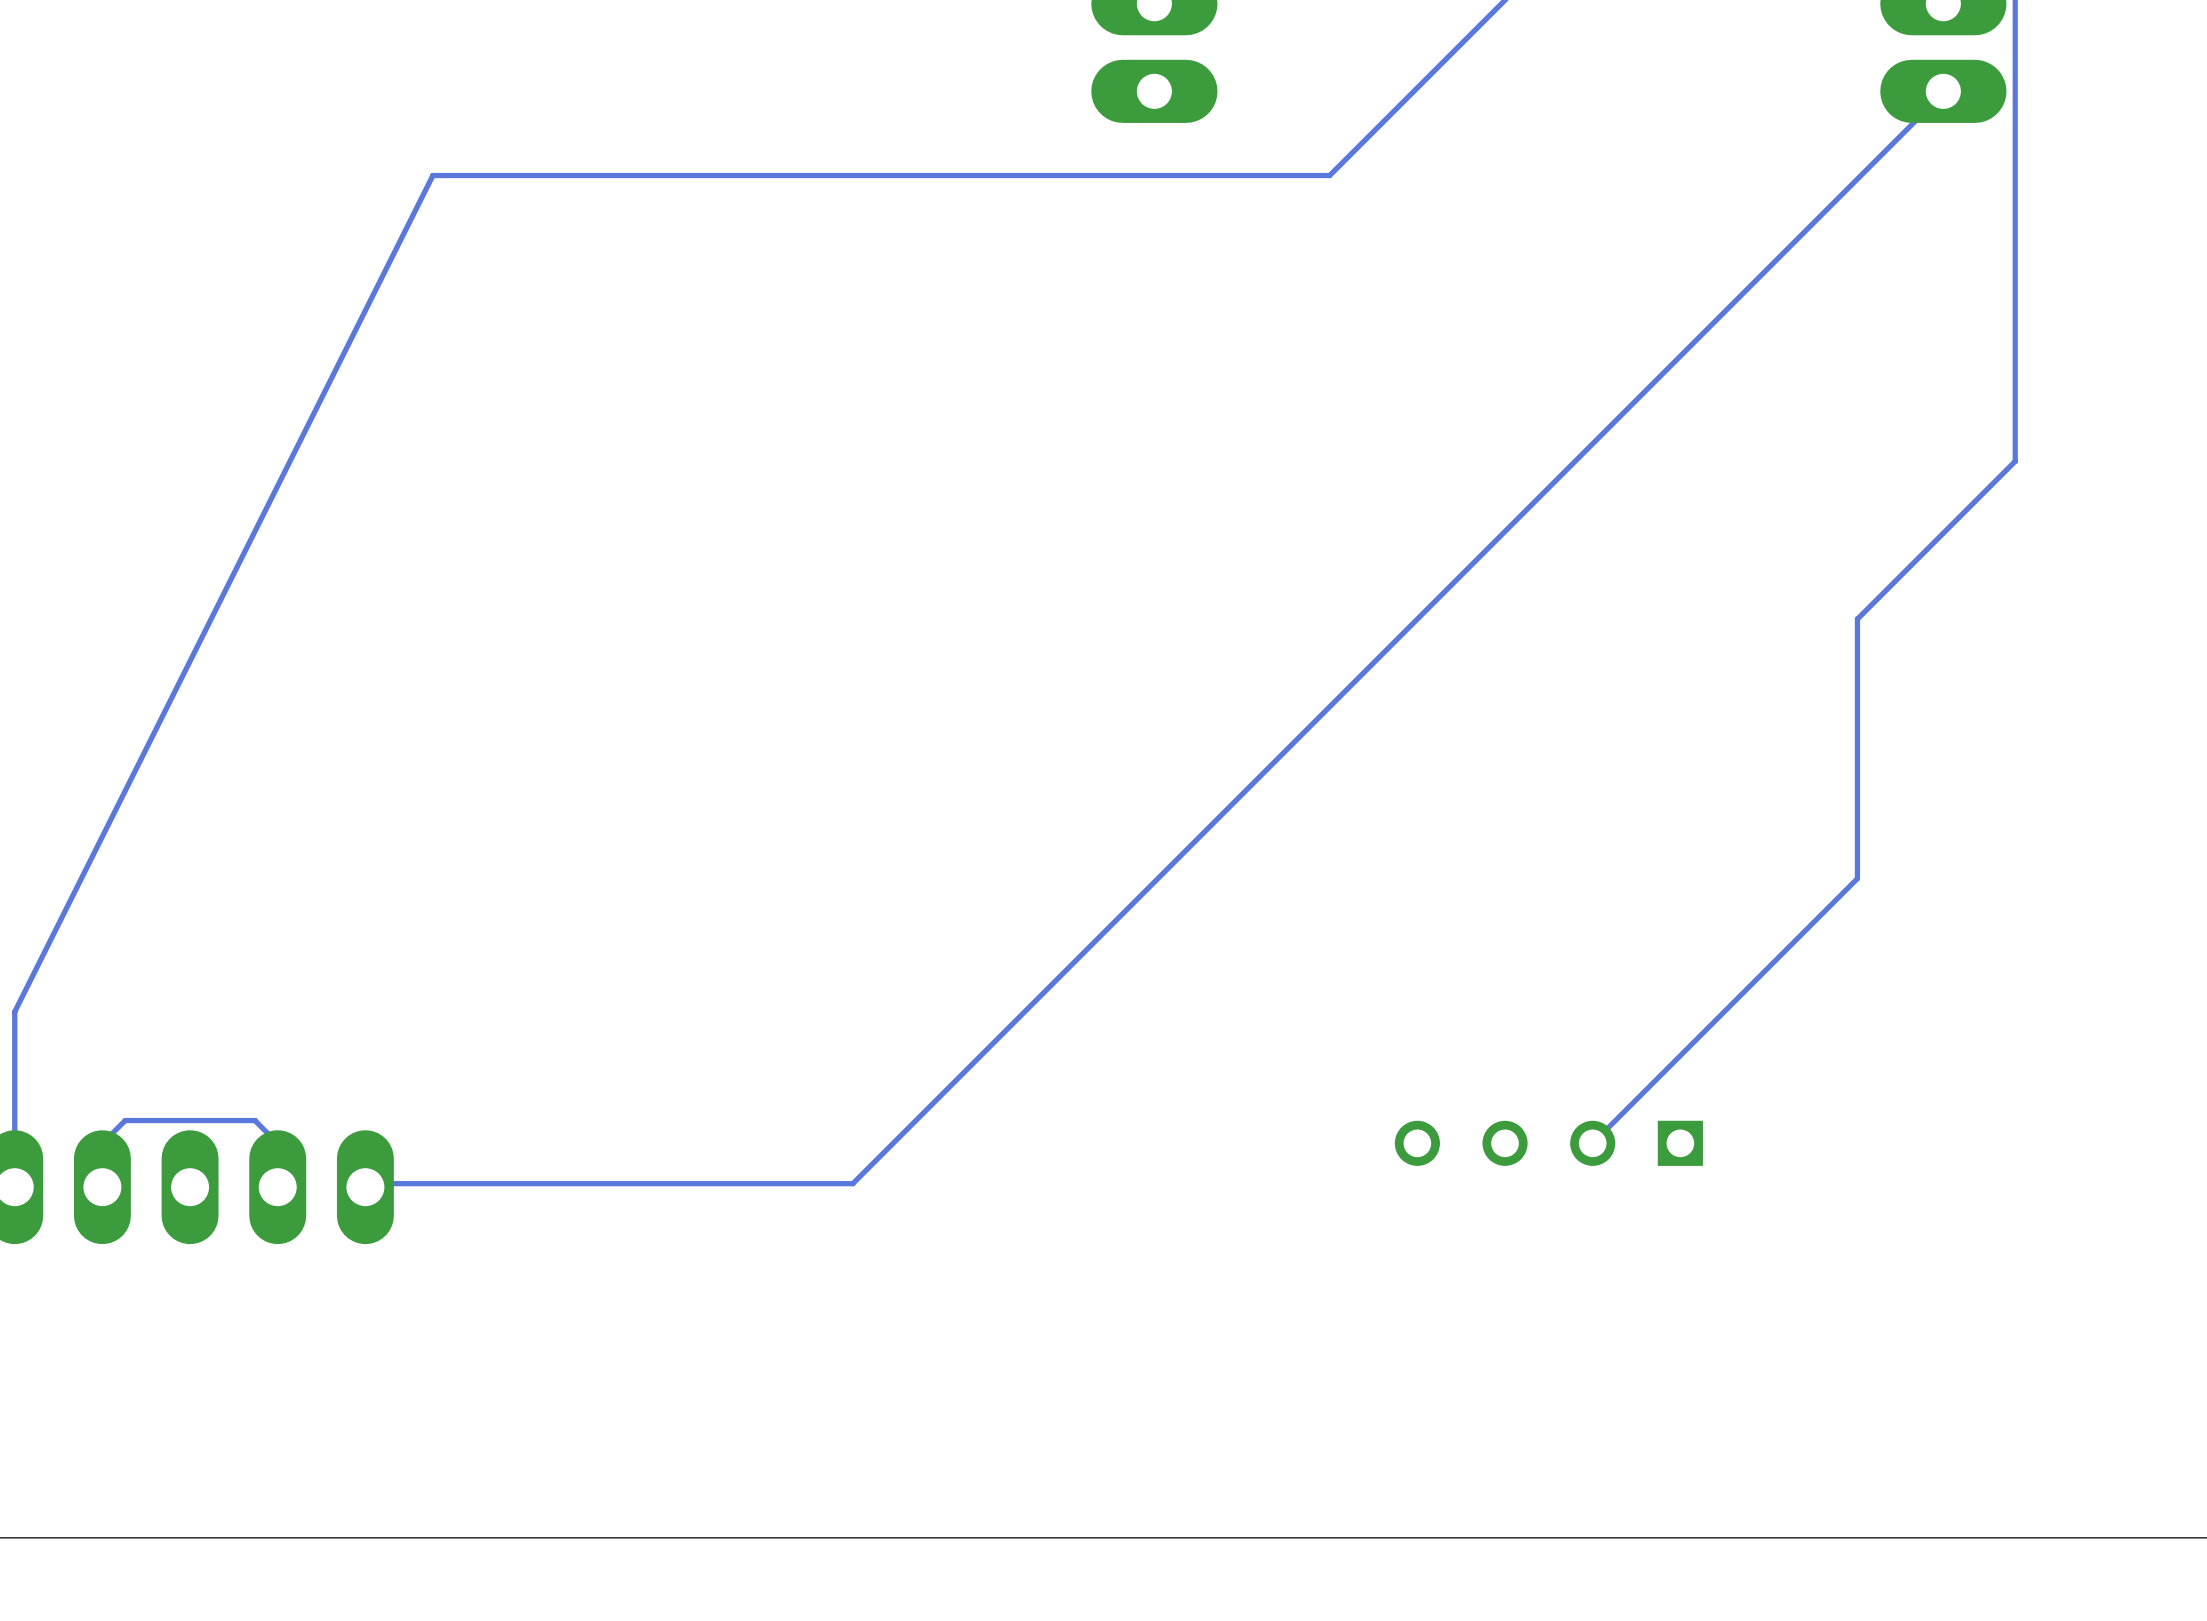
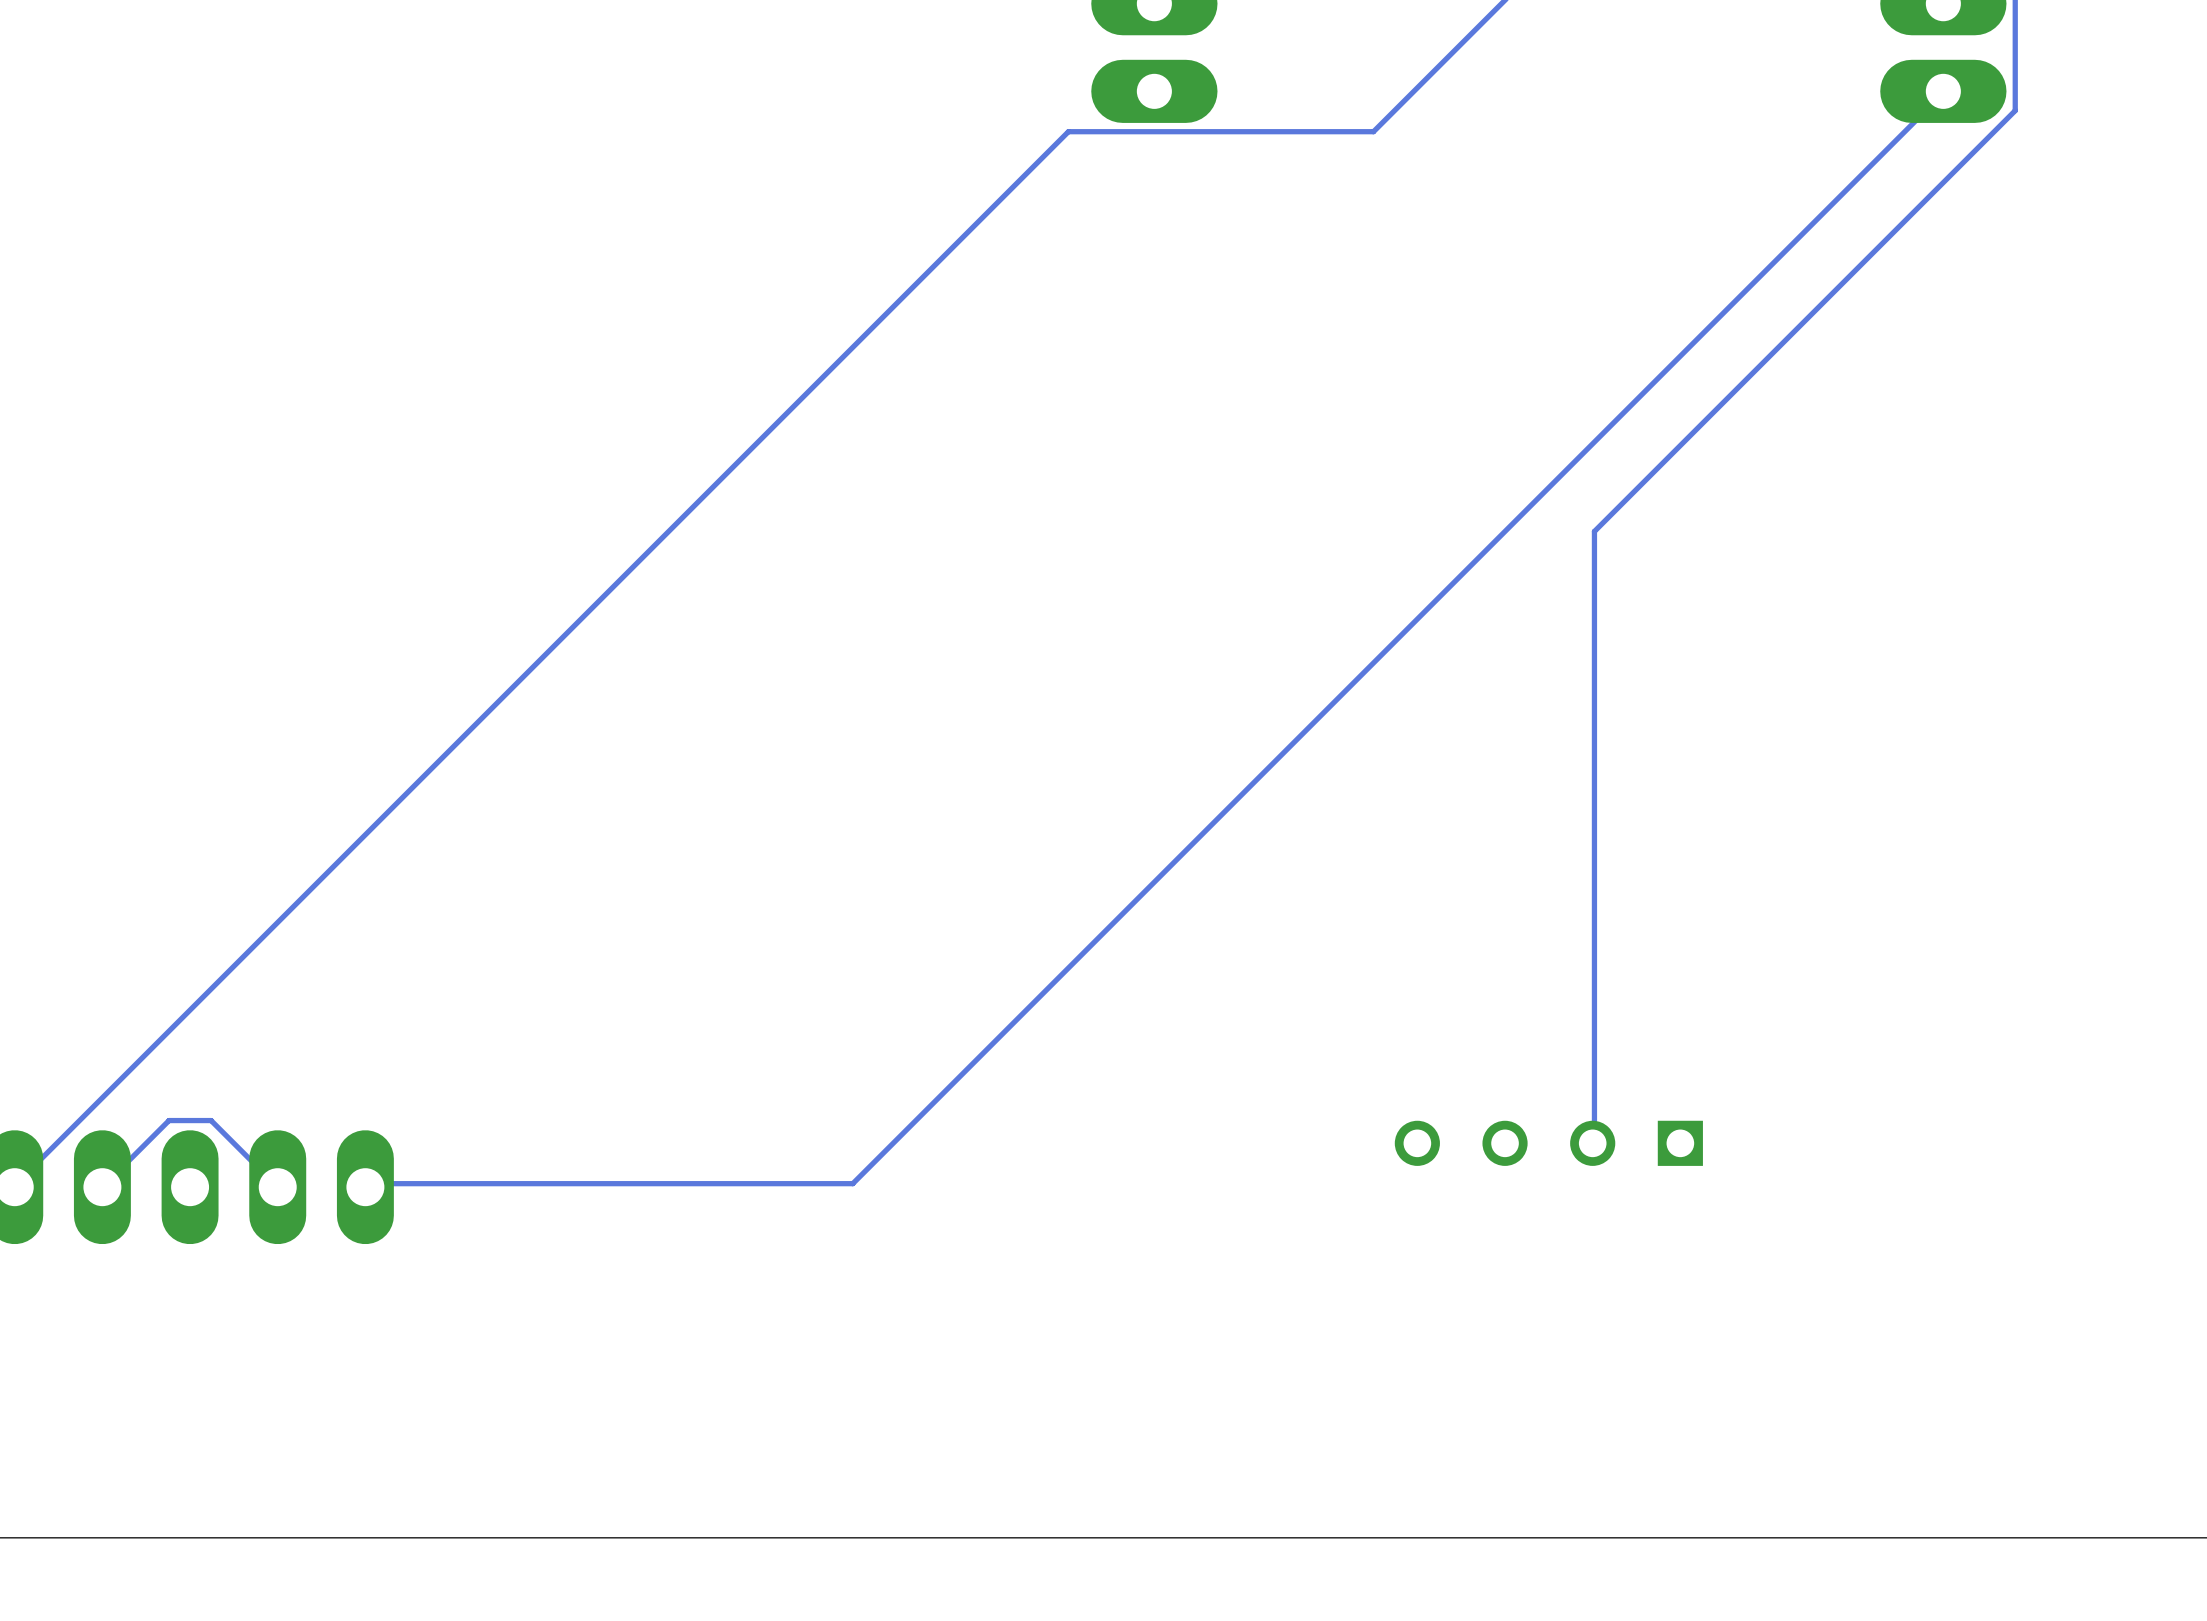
track: (2015, 110) (2015, 461) (1857, 619) (1857, 878) (1594, 1141) -> (2015, 110) (1594, 531) (1594, 1141)
track: (1373, 131) (1329, 175) (432, 175) (14, 1011) (14, 1187) -> (1373, 131) (1068, 131) (14, 1187)
track: (169, 1120) (125, 1120) (102, 1143) (102, 1187) -> (169, 1120) (102, 1187)
track: (211, 1120) (254, 1120) (277, 1143) (277, 1187) -> (211, 1120) (277, 1187)

